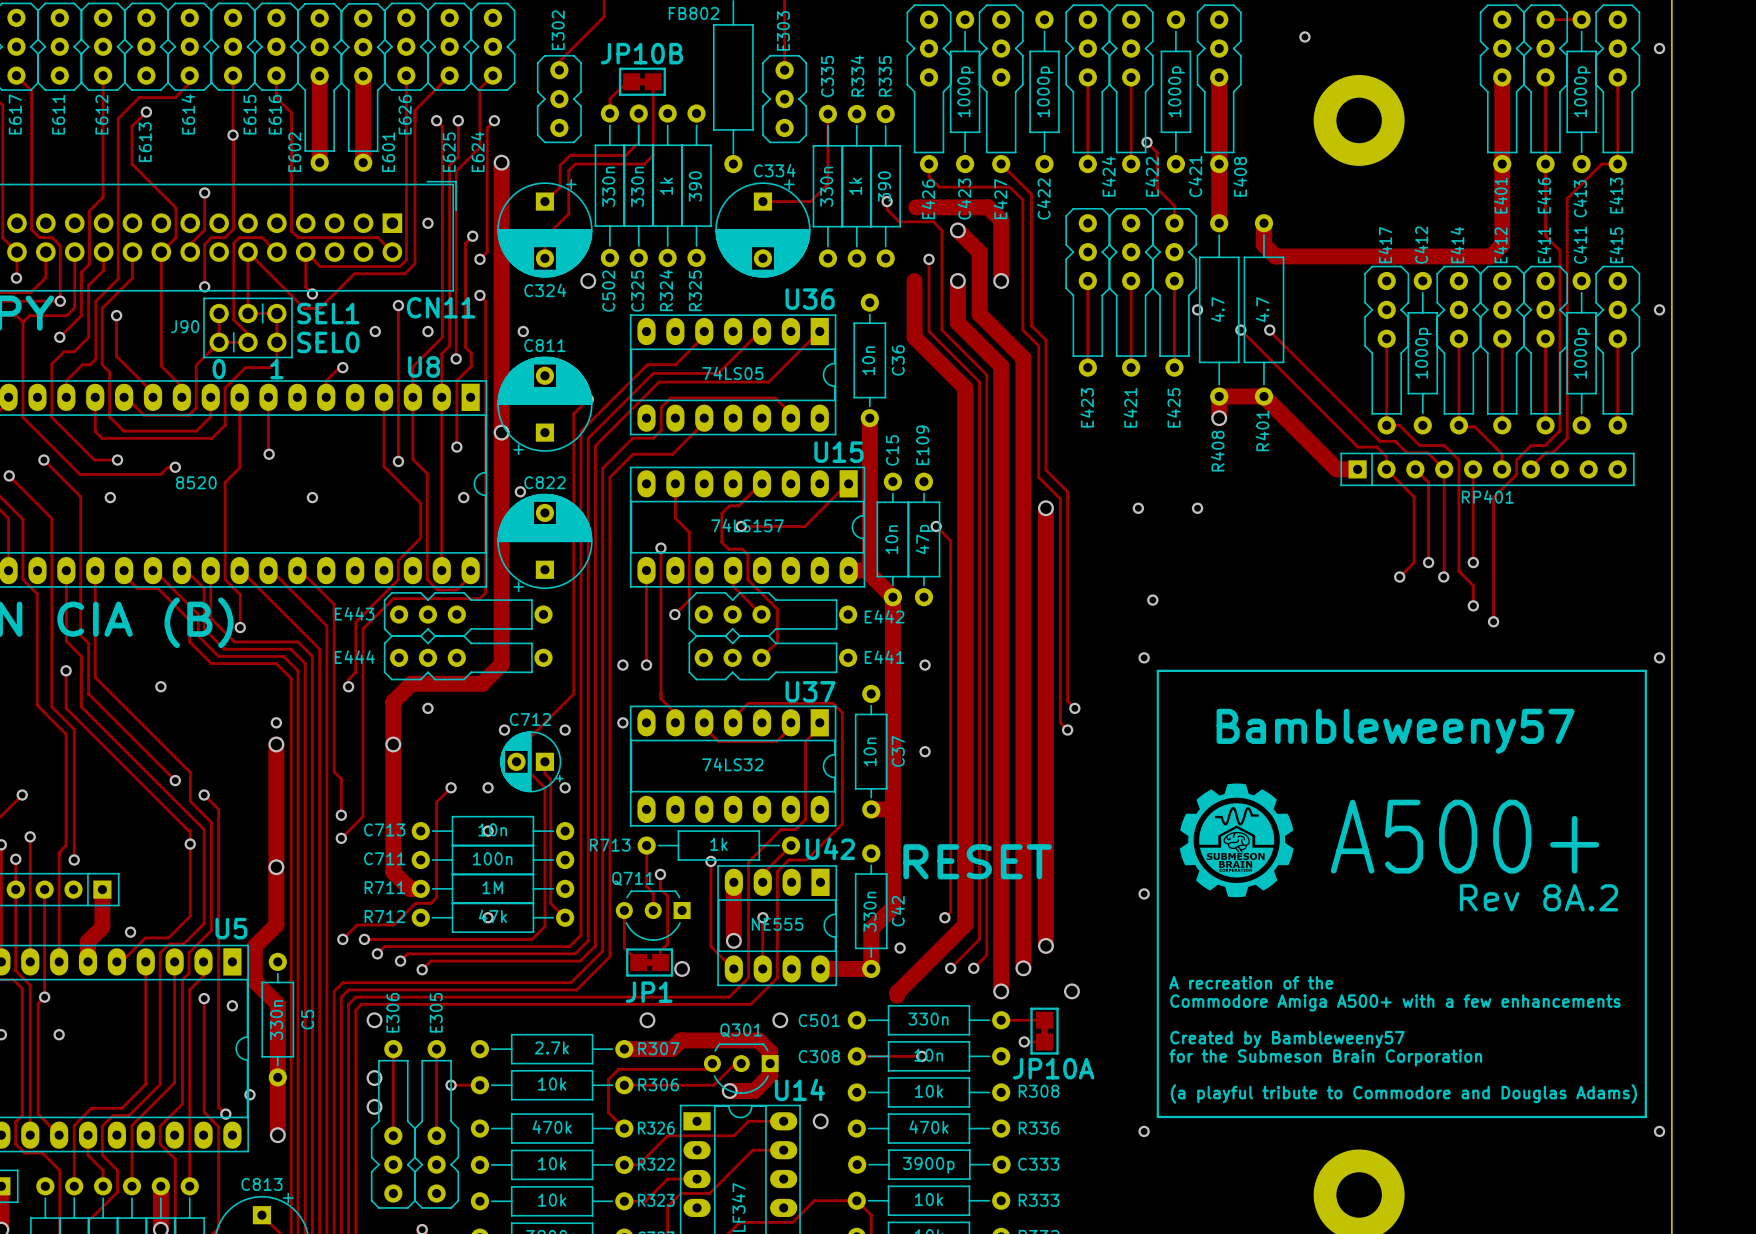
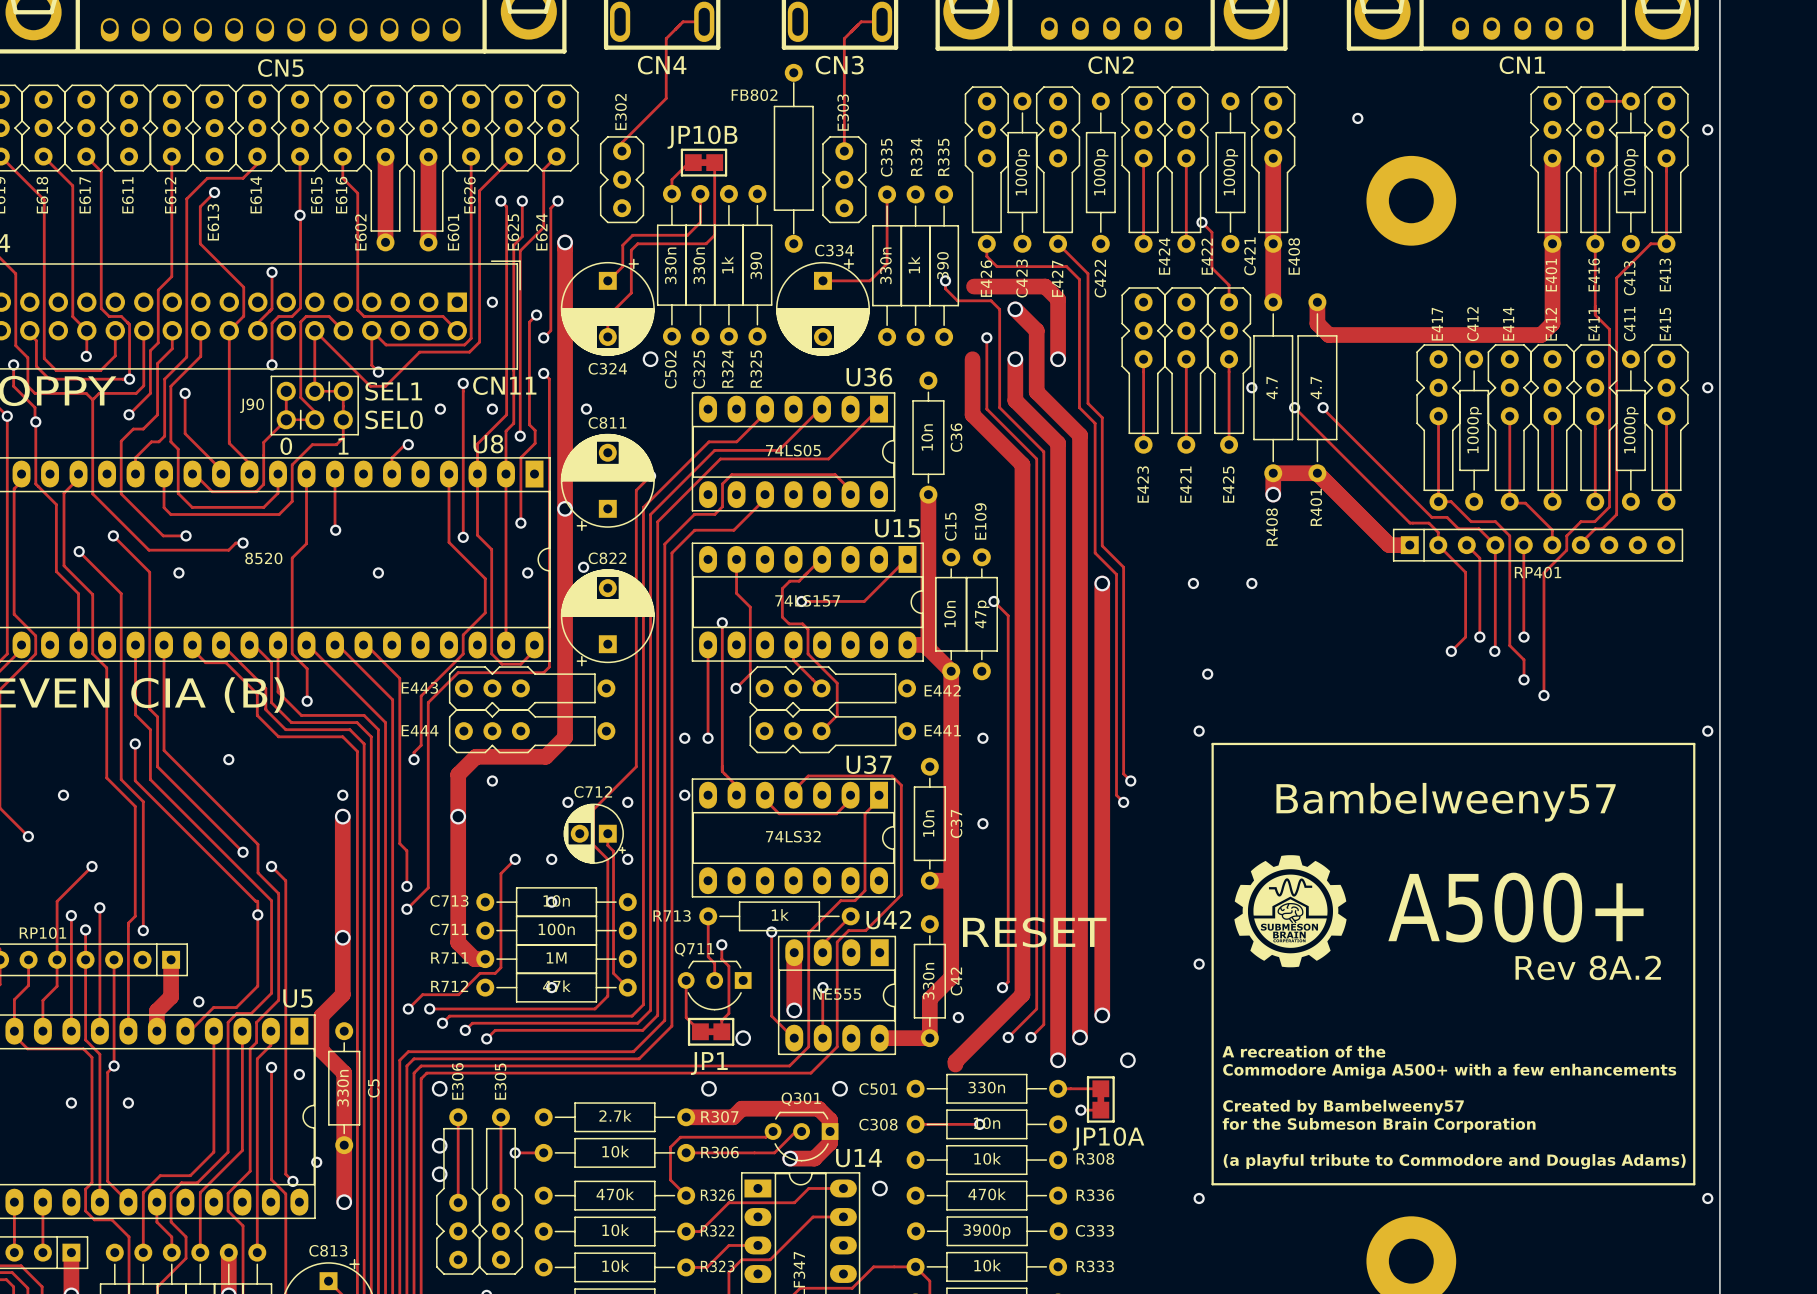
text: Bambleweeny57 (1395, 731) -> Bambelweeny57 (1446, 802)
text: Created by Bambleweeny57 (1287, 1039) -> Created by Bambelweeny57 (1343, 1107)

